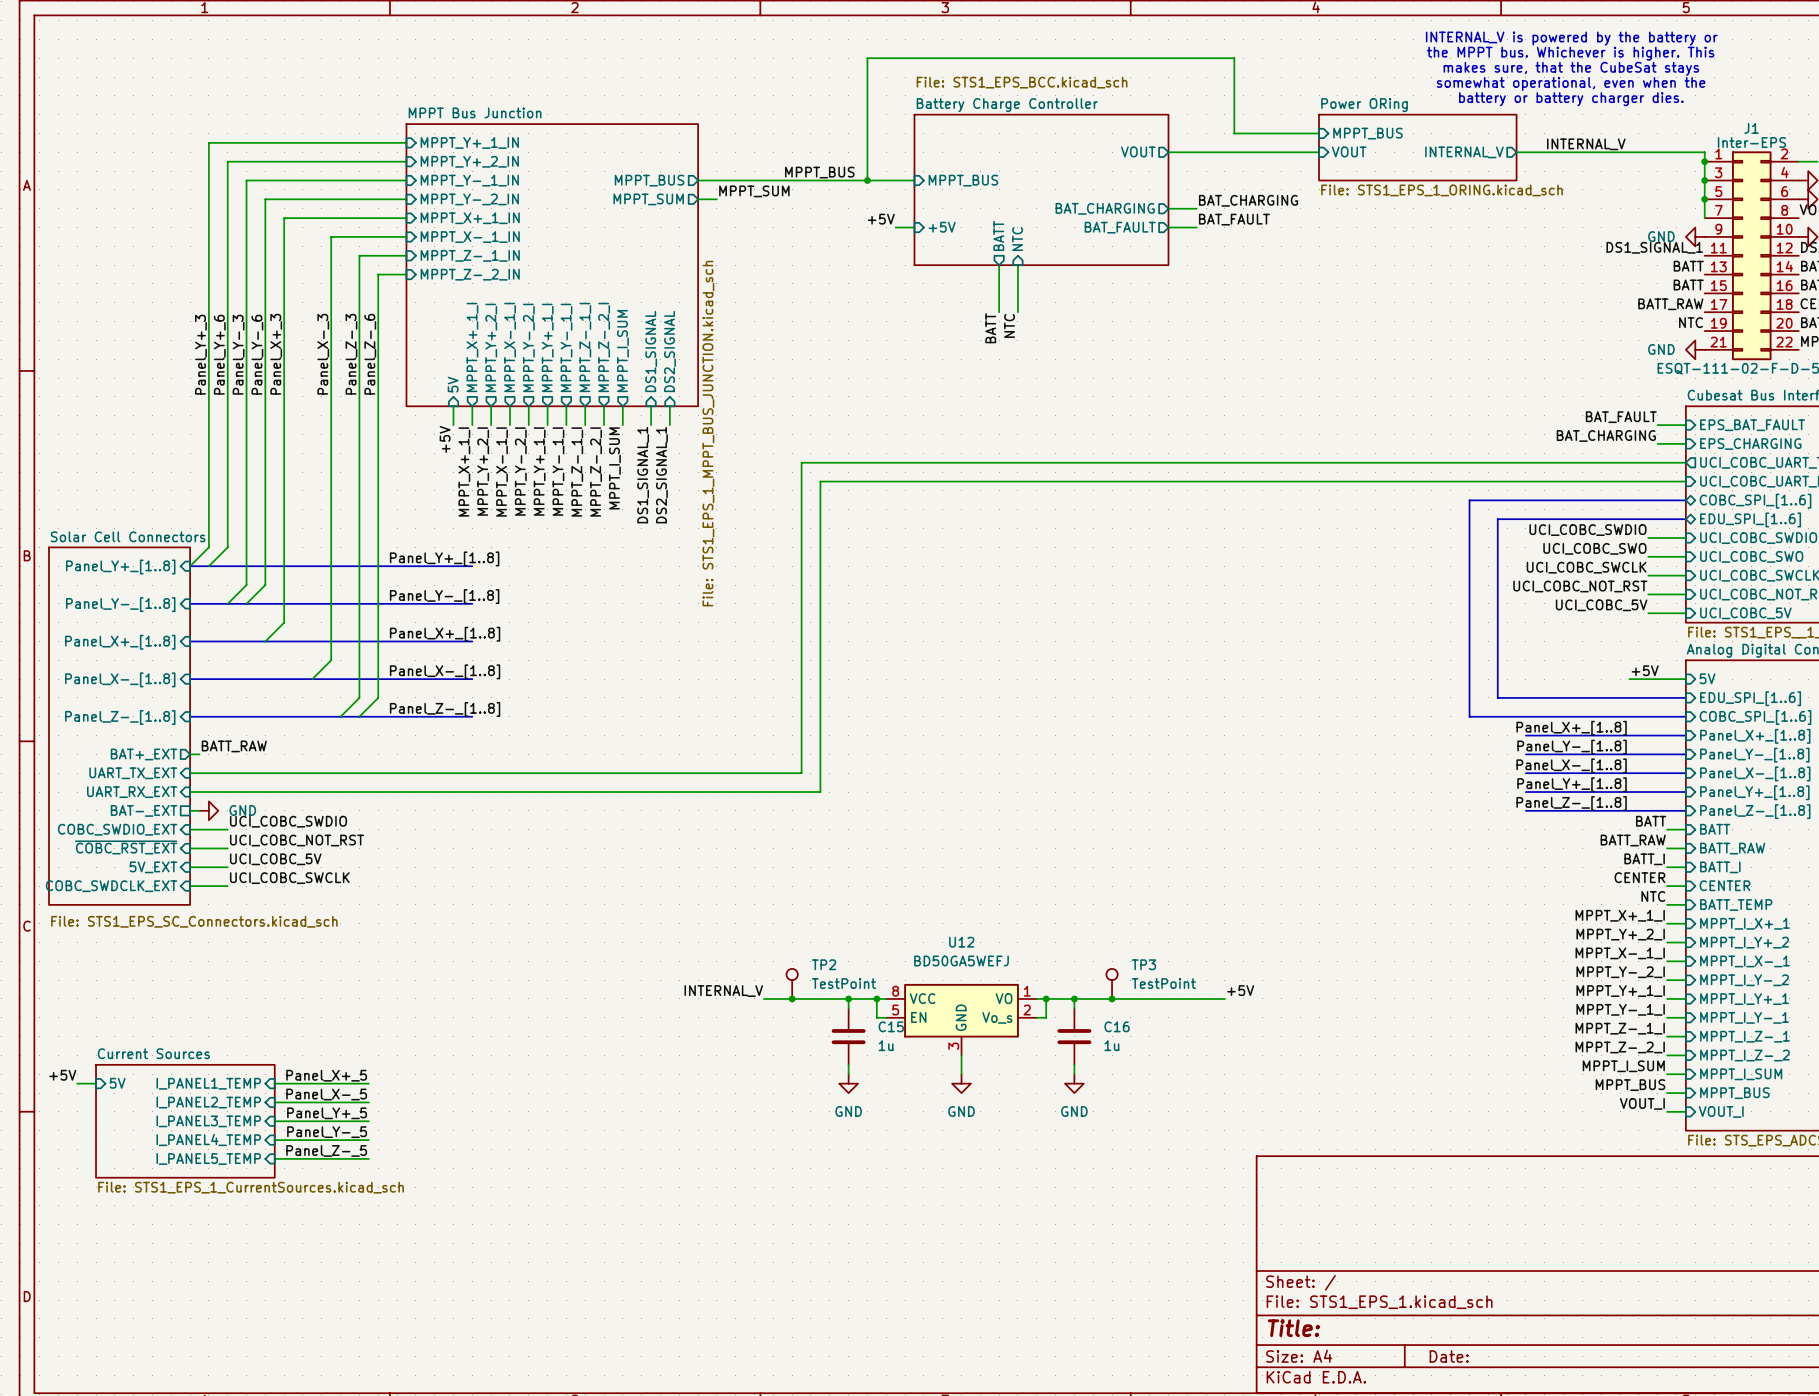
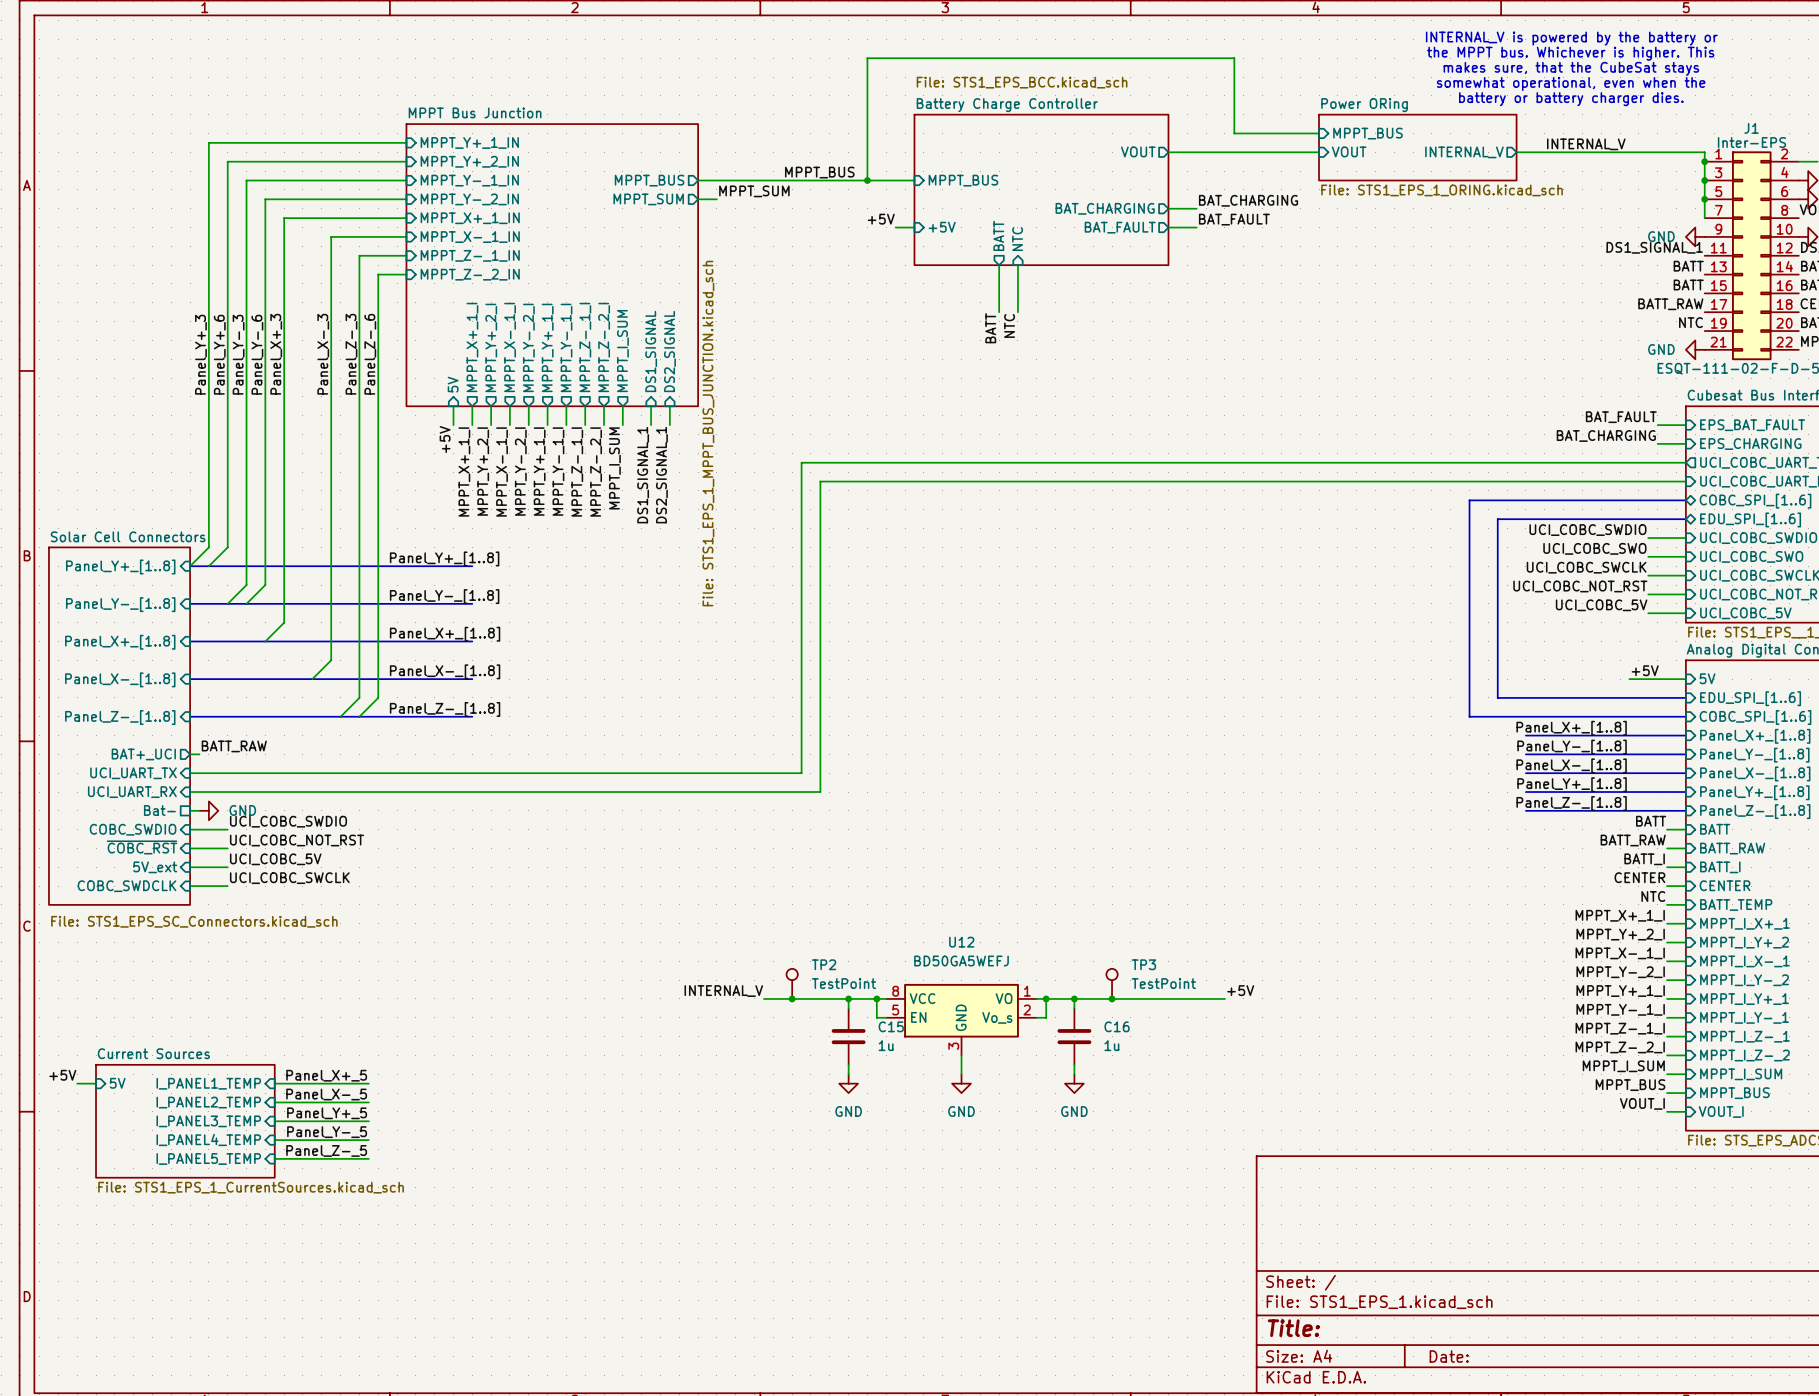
sheet pin: BAT+_EXT (144, 754) -> BAT+_UCI (143, 754)
sheet pin: UART_TX_EXT (133, 773) -> UCI_UART_TX (133, 773)
sheet pin: UART_RX_EXT (132, 792) -> UCI_UART_RX (132, 792)
sheet pin: BAT-_EXT (144, 810) -> Bat- (159, 810)
sheet pin: COBC_SWDIO_EXT (117, 829) -> COBC_SWDIO (133, 829)
sheet pin: ~{COBC_RST_EXT} (126, 847) -> ~{COBC_RST} (142, 847)
sheet pin: 5V_EXT (153, 867) -> 5V_ext (155, 867)
sheet pin: COBC_SWDCLK_EXT (111, 886) -> COBC_SWDCLK (127, 886)

